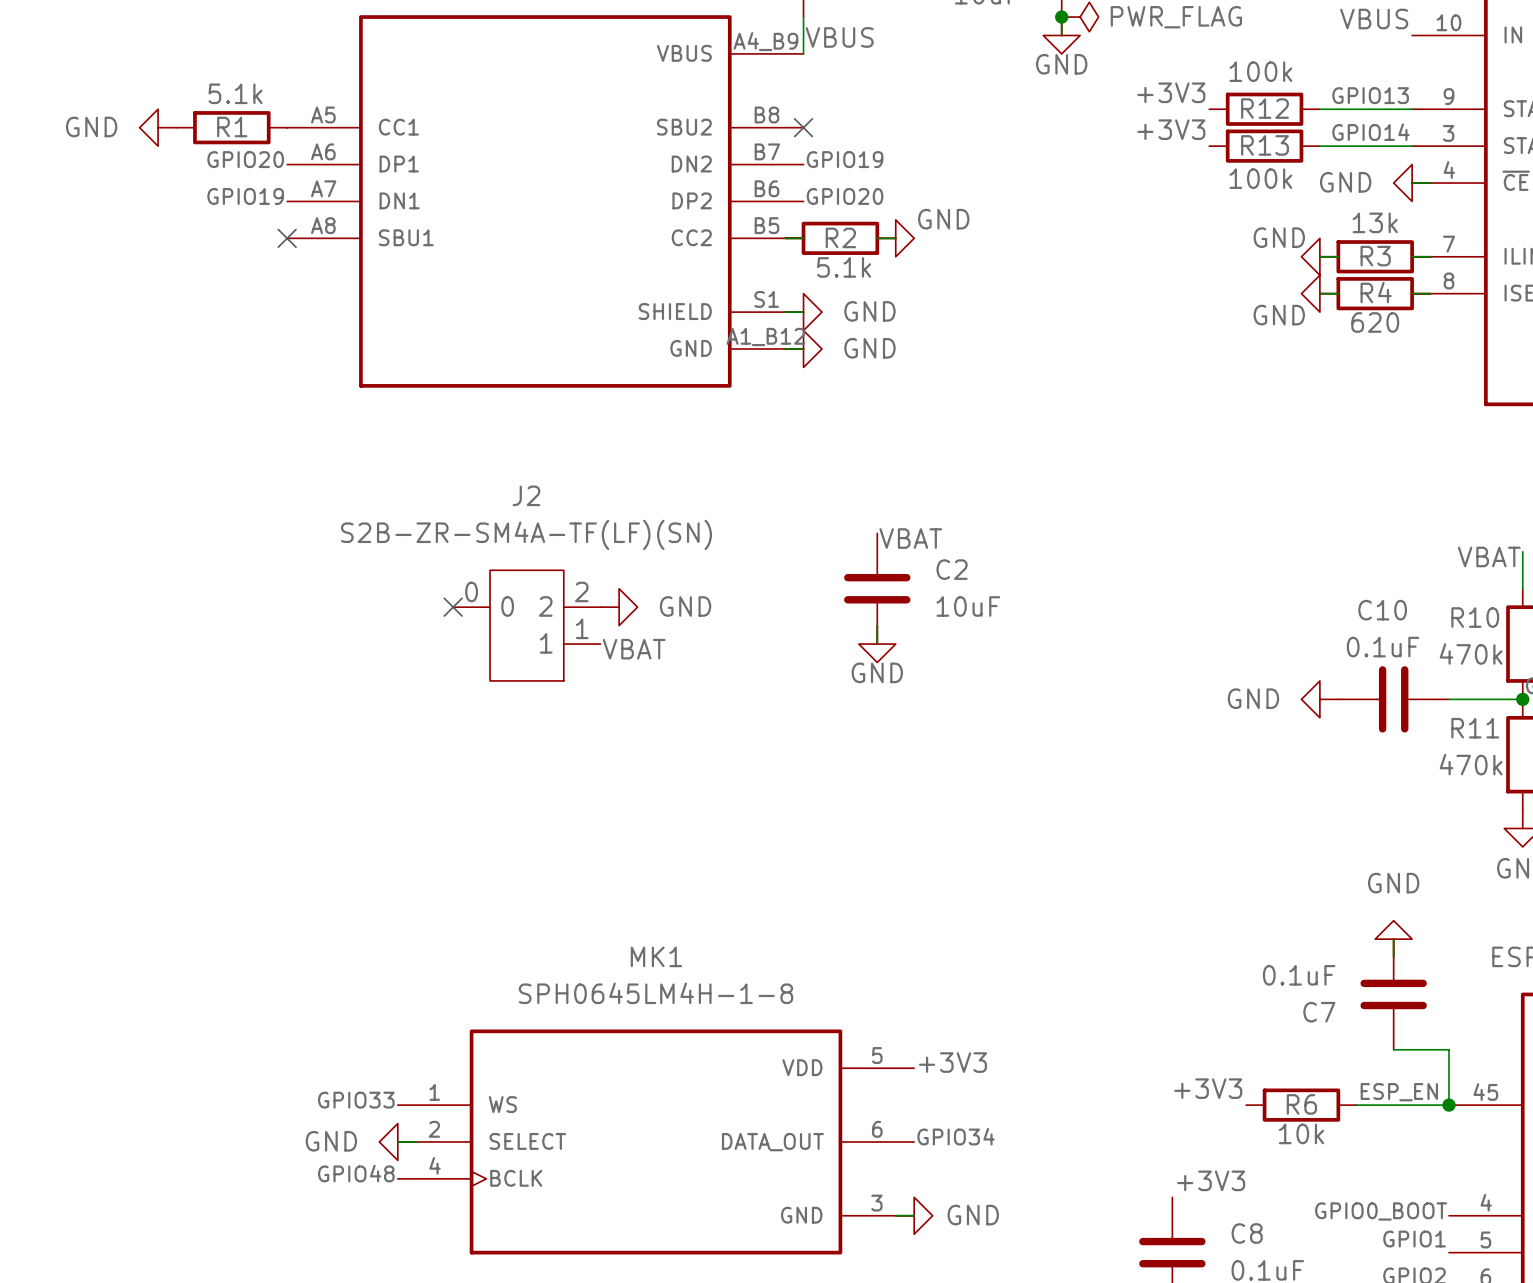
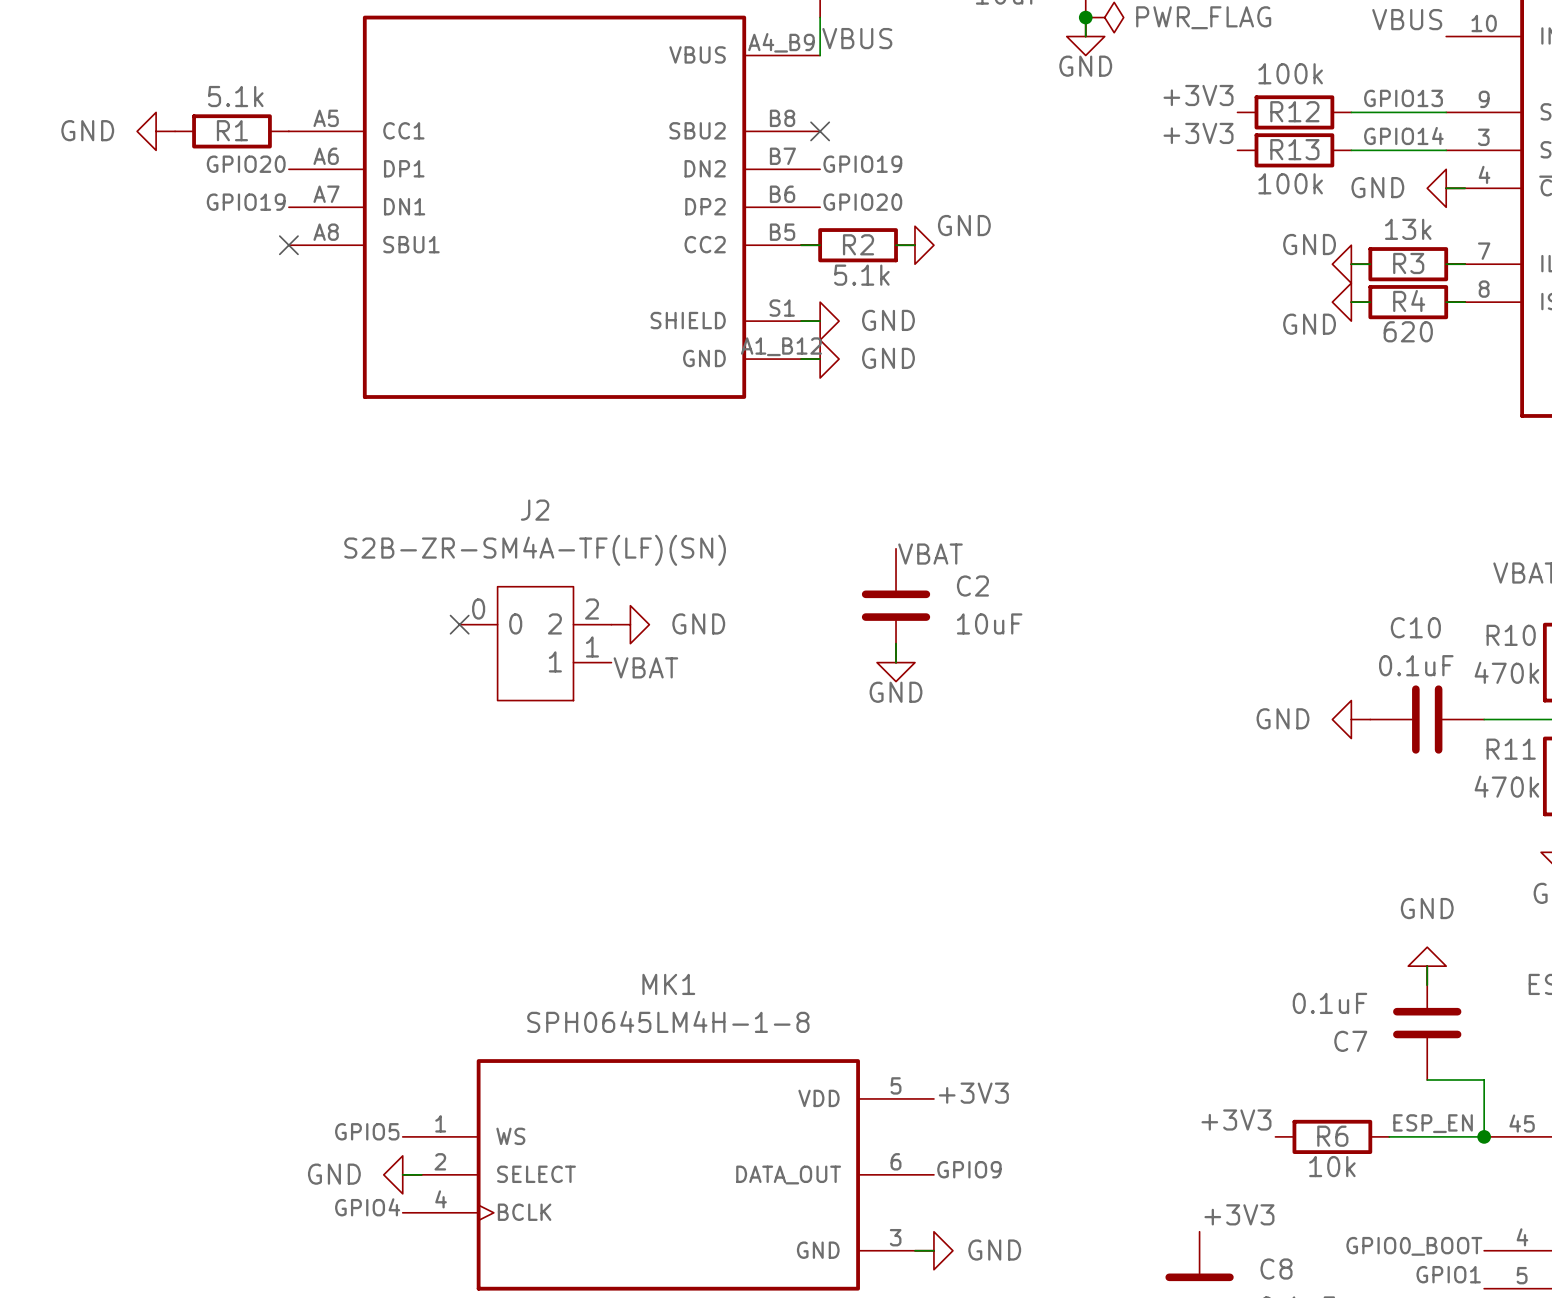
label: GPIO33 (356, 1100) -> GPIO5 (367, 1131)
label: GPIO34 (956, 1136) -> GPIO9 (969, 1169)
label: GPIO48 (356, 1173) -> GPIO4 (367, 1207)

